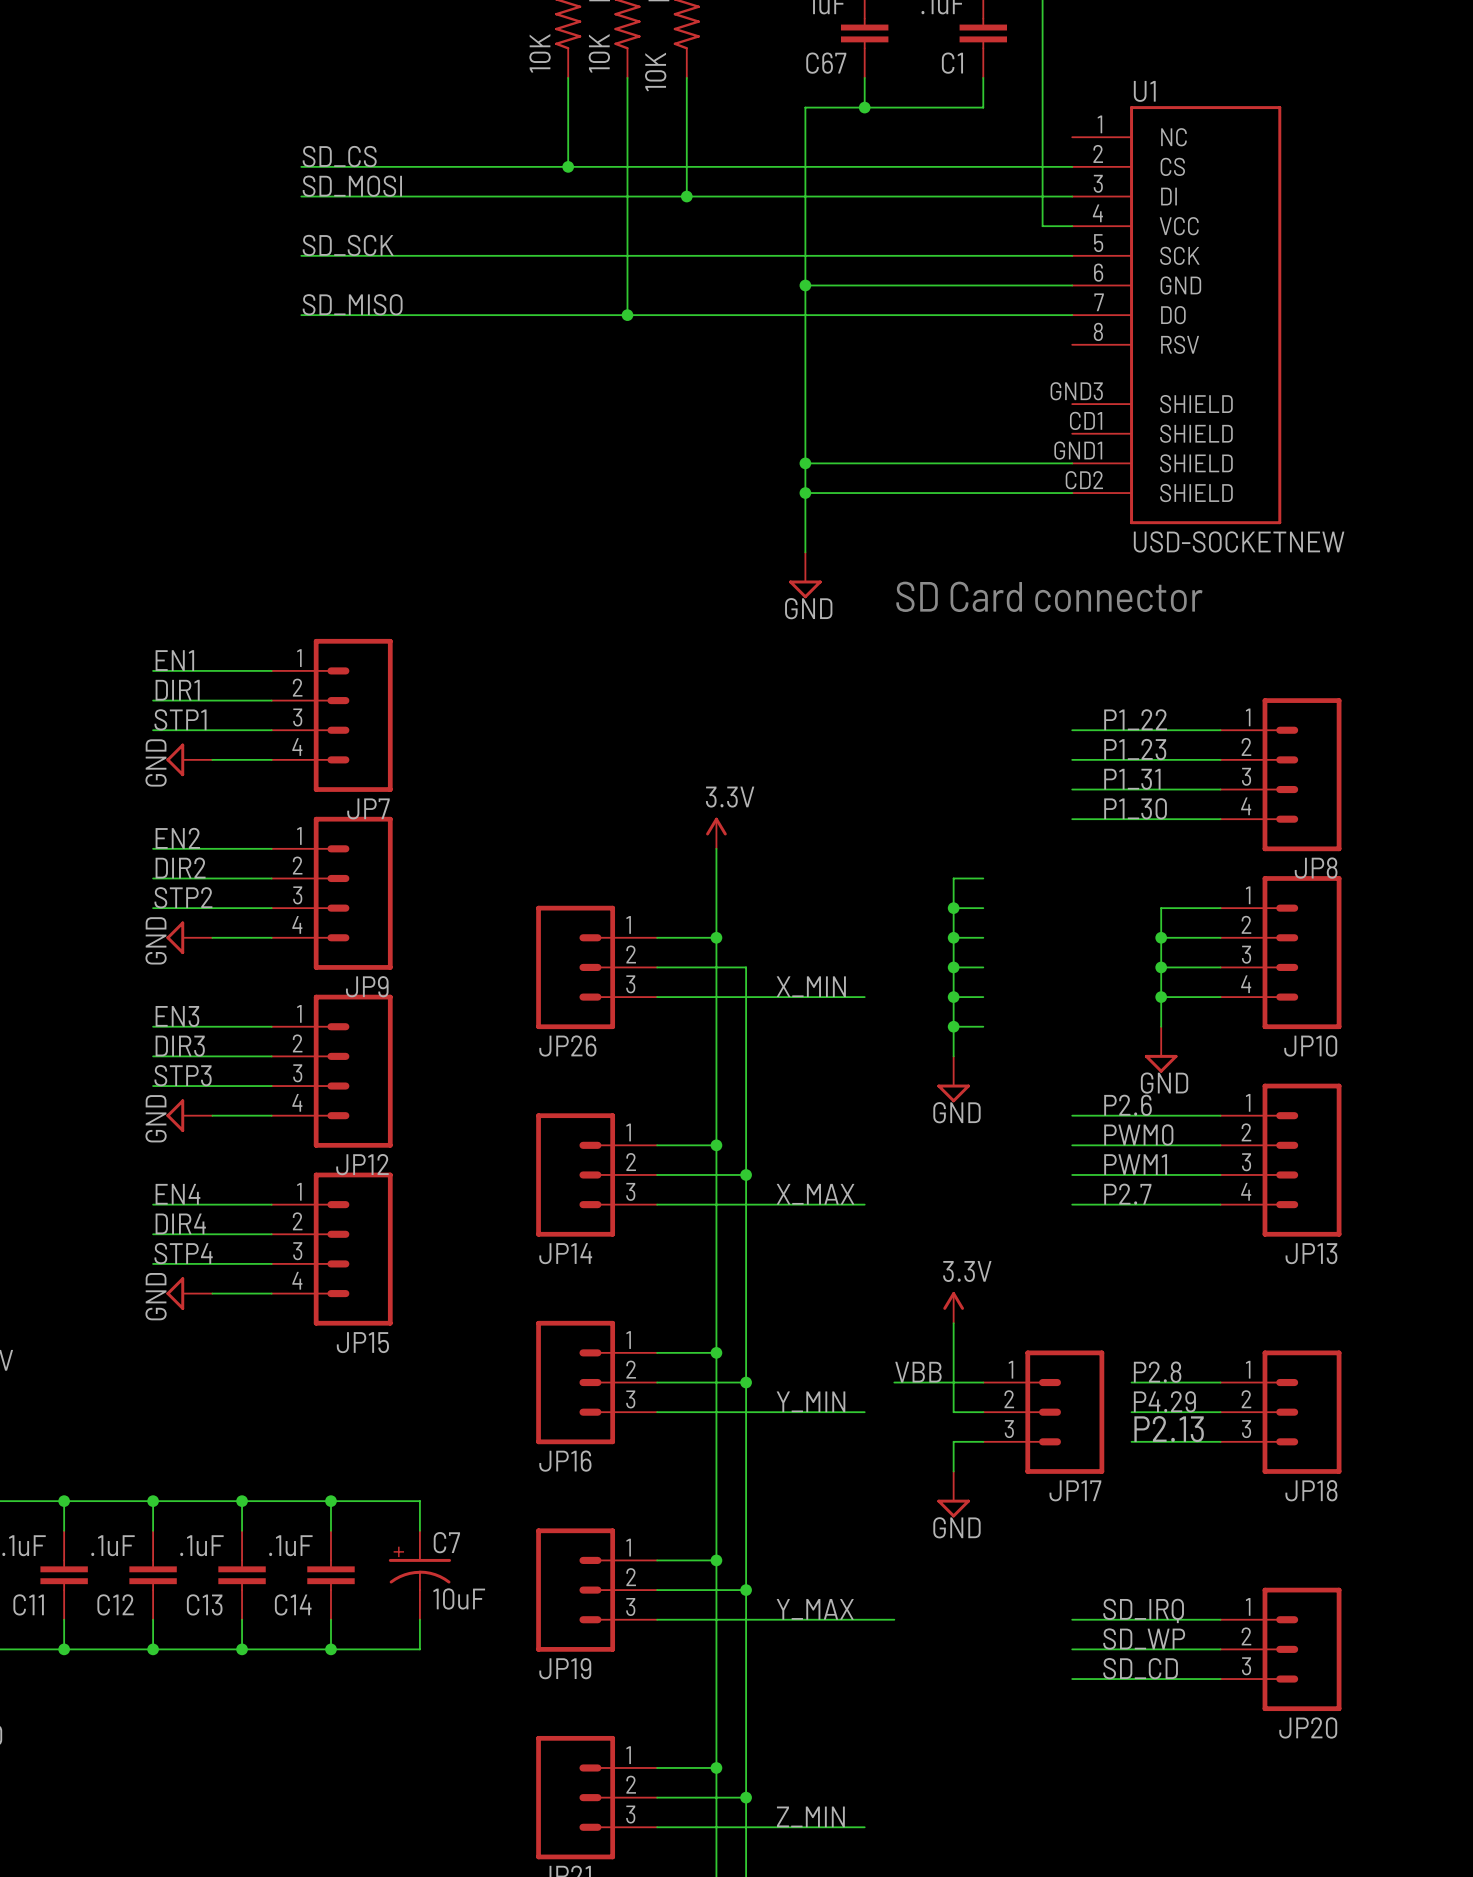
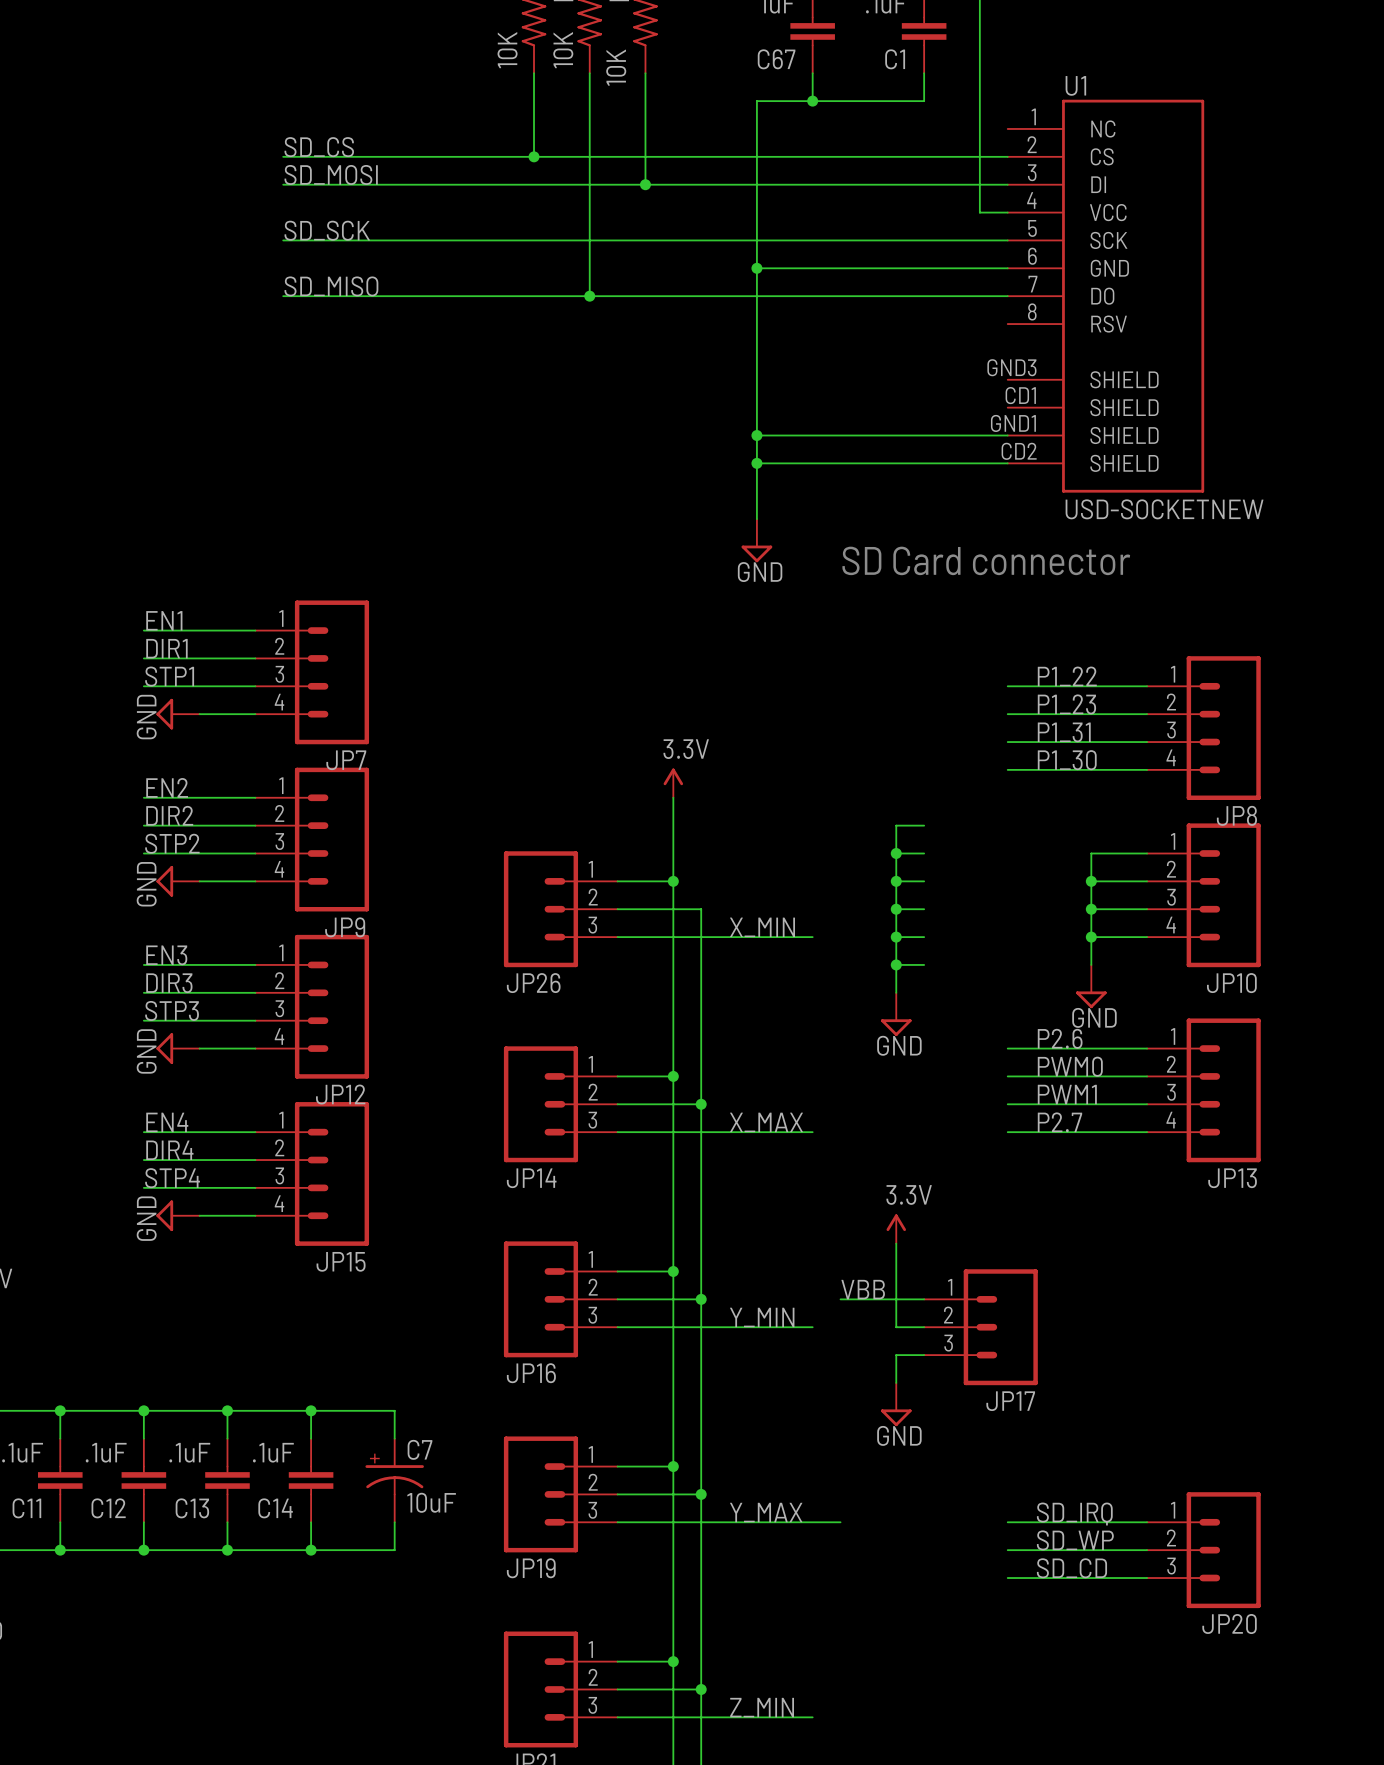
label: P2.8 (1157, 1372) -> none
wire: (1131, 1382) (1220, 1382) -> none
label: P4.29 (1164, 1401) -> none
wire: (1131, 1412) (1220, 1412) -> none
JP18: (1280, 1412) -> none
label: P2.13 (1169, 1429) -> none
wire: (1131, 1441) (1220, 1441) -> none

